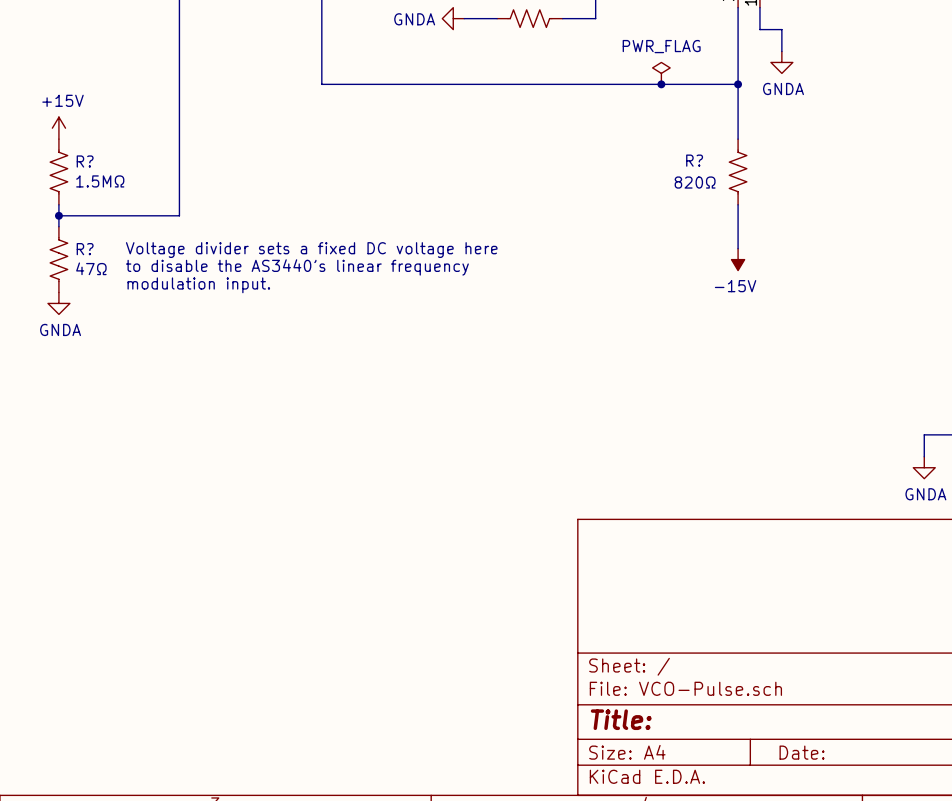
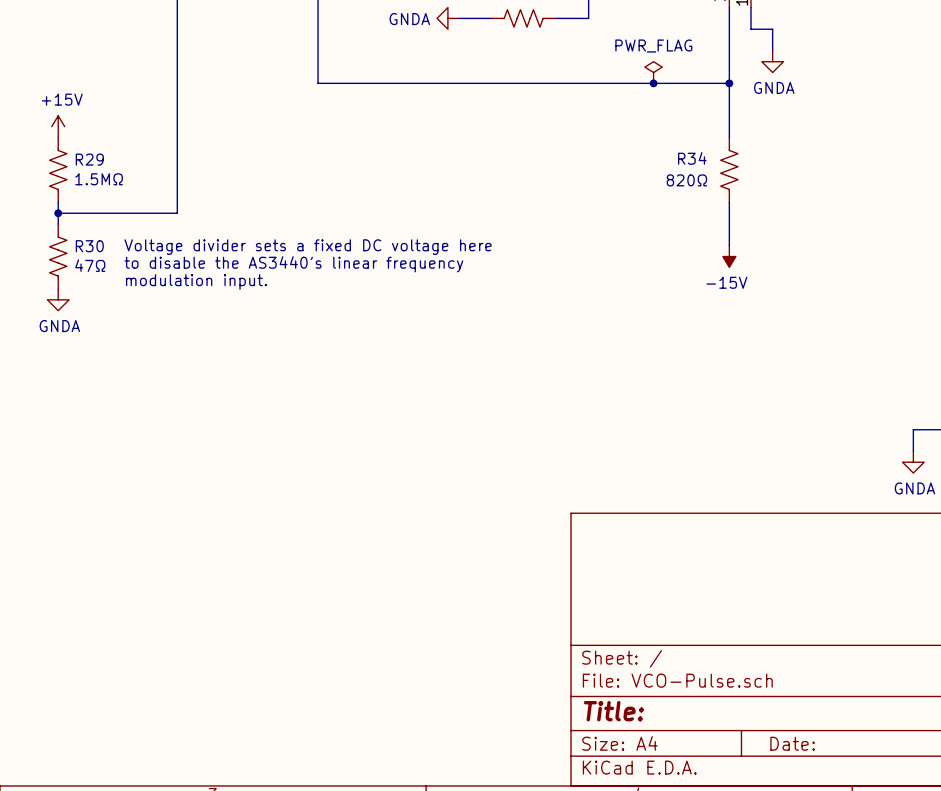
R? name: R? (694, 160) -> R34 (692, 158)
R? name: R? (85, 161) -> R29 (89, 159)
R? name: R? (85, 249) -> R30 (89, 246)

